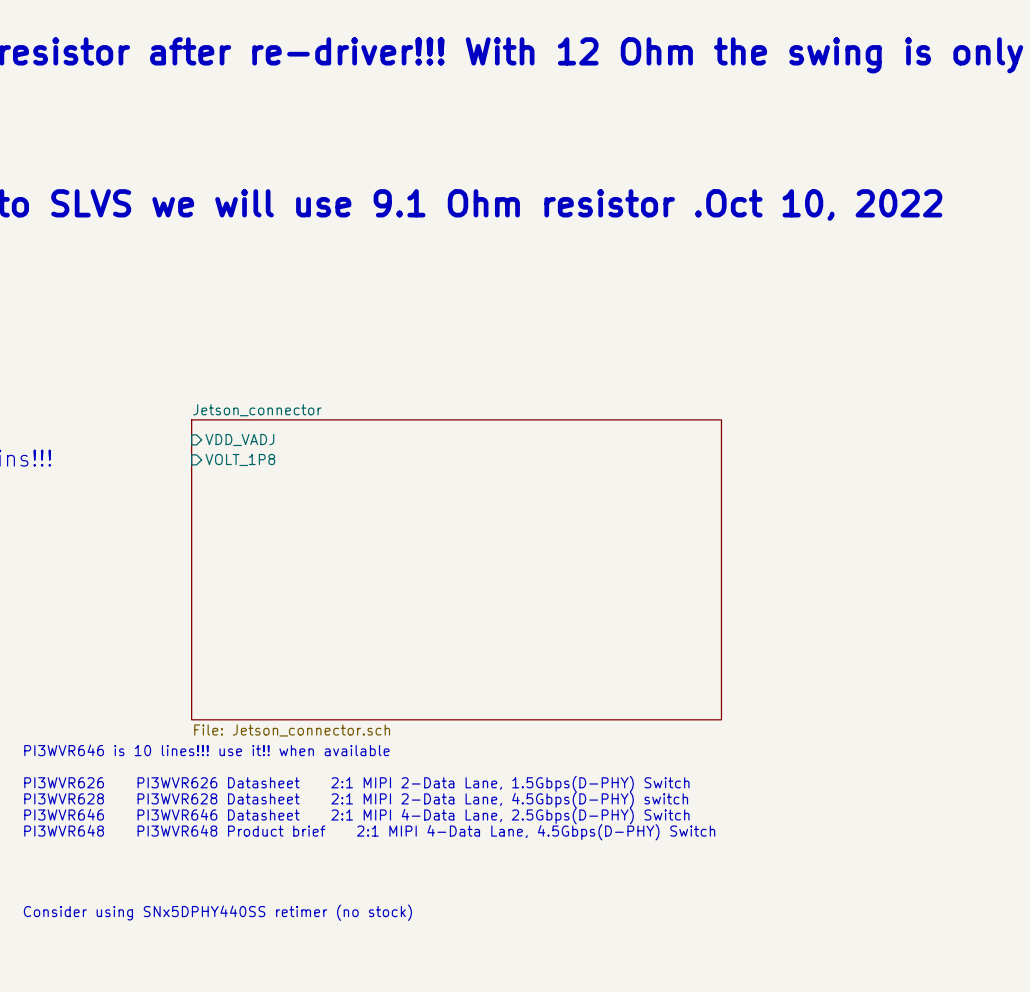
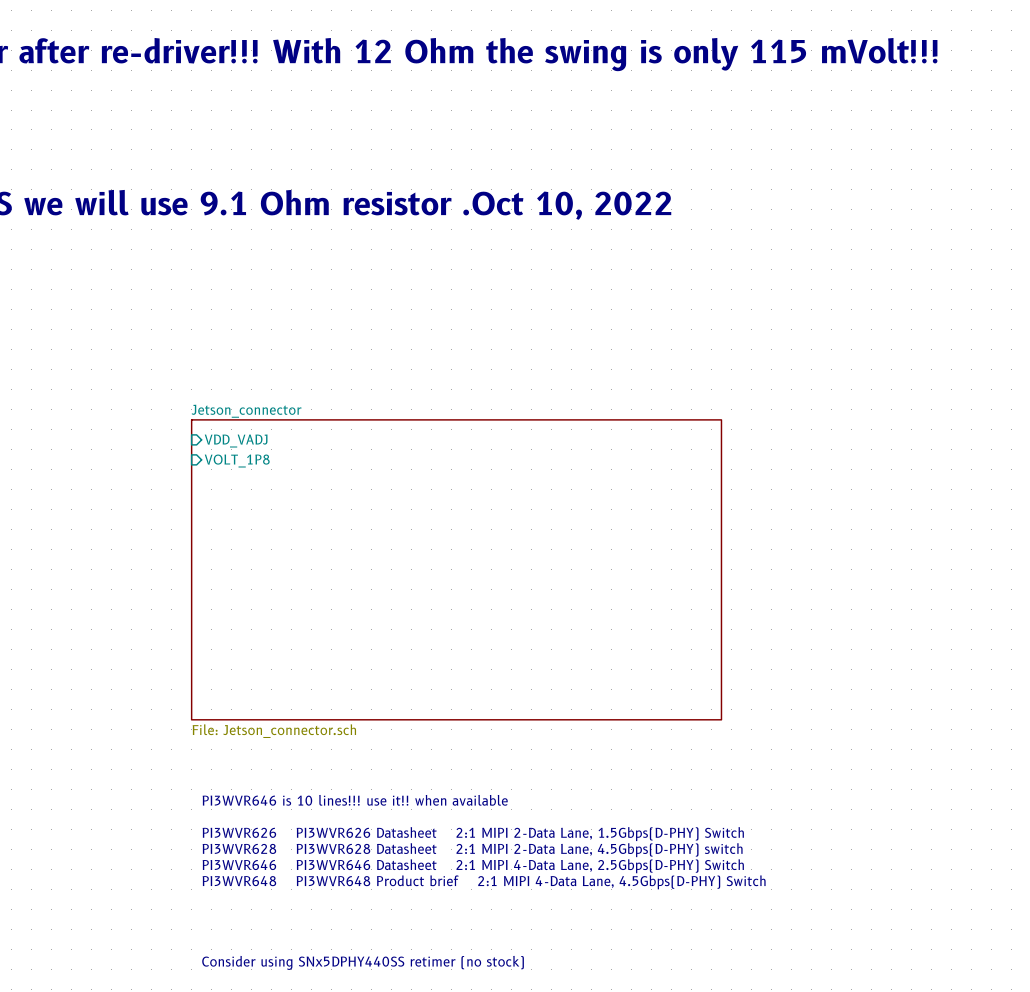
text position: PI3WVR646 is 10 lines!!! use it!! when available (206, 750) -> PI3WVR646 is 10 lines!!! use it!! when available (355, 800)
text position: PI3WVR626 PI3WVR626 Datasheet 2:1 MIPI 2-Data Lane, 1.5Gbps(D-PHY) Switch (356, 783) -> PI3WVR626 PI3WVR626 Datasheet 2:1 MIPI 2-Data Lane, 1.5Gbps(D-PHY) Switch (473, 834)
text position: PI3WVR628 PI3WVR628 Datasheet 2:1 MIPI 2-Data Lane, 4.5Gbps(D-PHY) switch (356, 800) -> PI3WVR628 PI3WVR628 Datasheet 2:1 MIPI 2-Data Lane, 4.5Gbps(D-PHY) switch (472, 850)
text position: PI3WVR646 PI3WVR646 Datasheet 2:1 MIPI 4-Data Lane, 2.5Gbps(D-PHY) Switch (356, 816) -> PI3WVR646 PI3WVR646 Datasheet 2:1 MIPI 4-Data Lane, 2.5Gbps(D-PHY) Switch (473, 866)
text position: PI3WVR648 PI3WVR648 Product brief 2:1 MIPI 4-Data Lane, 4.5Gbps(D-PHY) Switch (369, 832) -> PI3WVR648 PI3WVR648 Product brief 2:1 MIPI 4-Data Lane, 4.5Gbps(D-PHY) Switch (484, 882)
text position: Consider using SNx5DPHY440SS retimer (no stock) (217, 912) -> Consider using SNx5DPHY440SS retimer (no stock) (363, 962)

